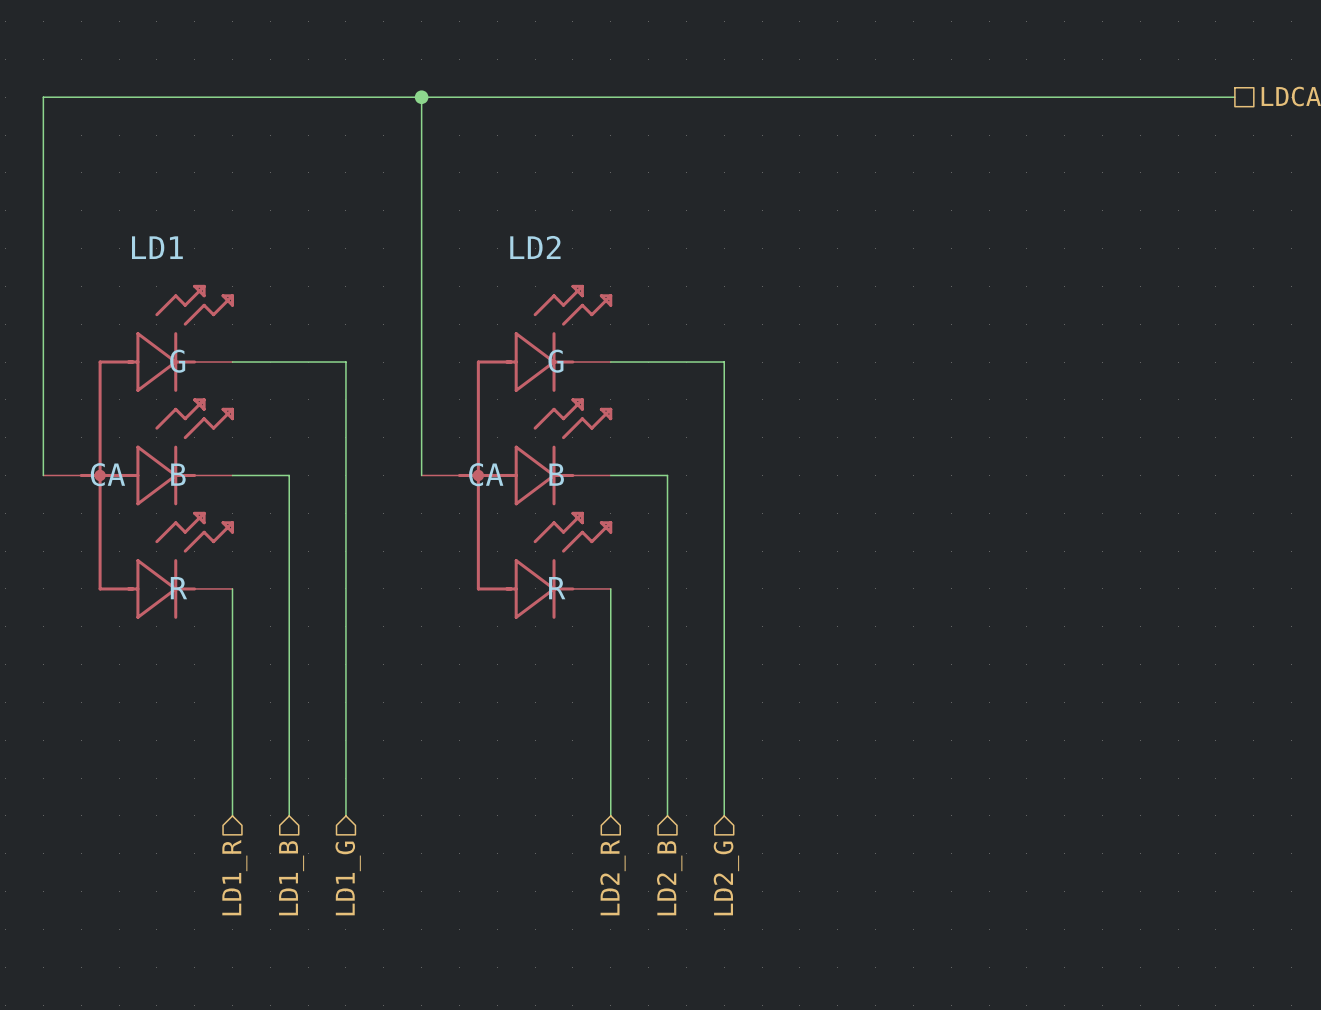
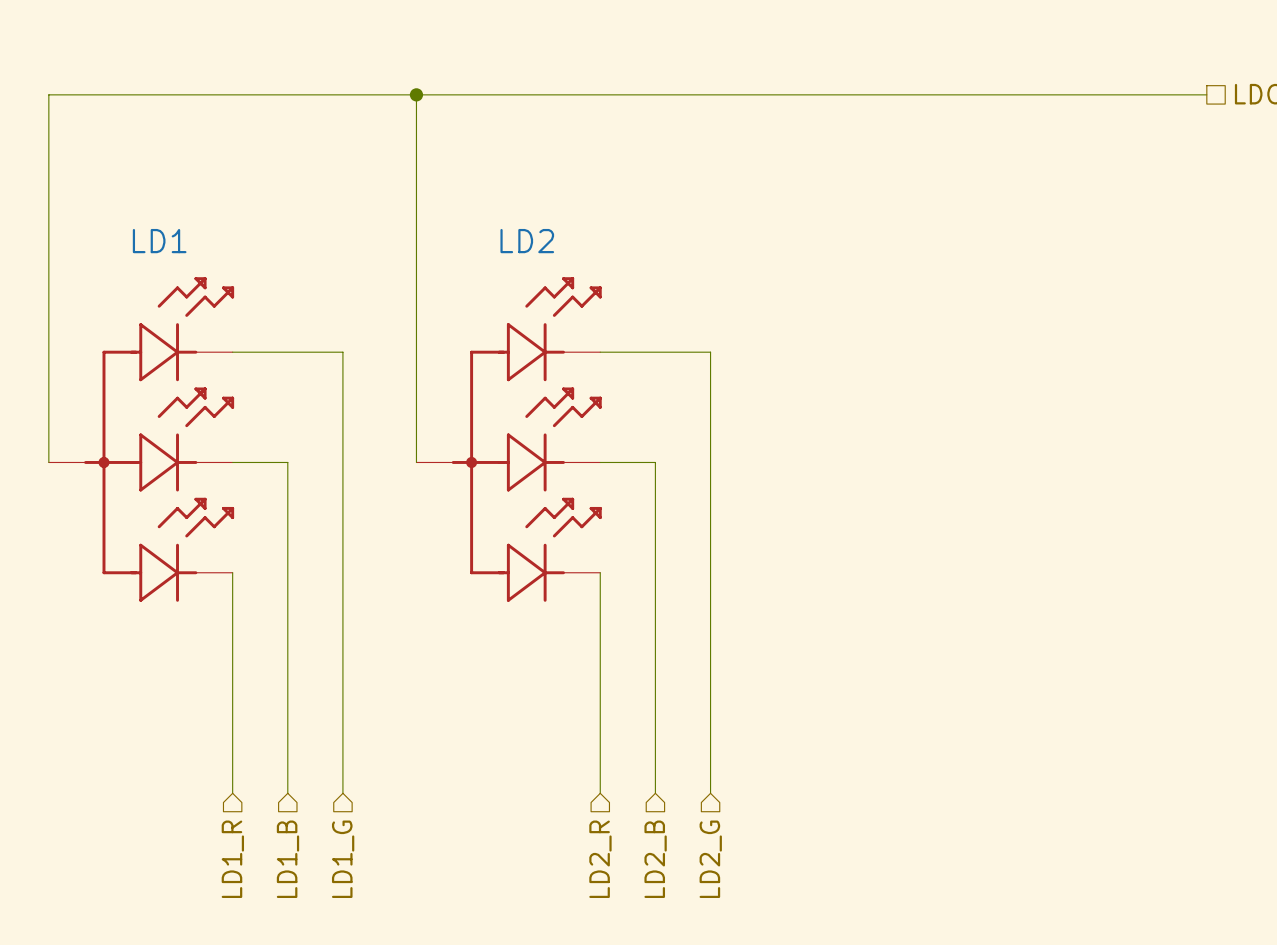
LD1 pin name: G (177, 361) -> none
LD2 pin name: G (555, 361) -> none
LD1 pin name: CA (107, 474) -> none
LD1 pin name: B (178, 474) -> none
LD2 pin name: CA (486, 474) -> none
LD2 pin name: B (556, 474) -> none
LD1 pin name: R (178, 588) -> none
LD2 pin name: R (557, 588) -> none

